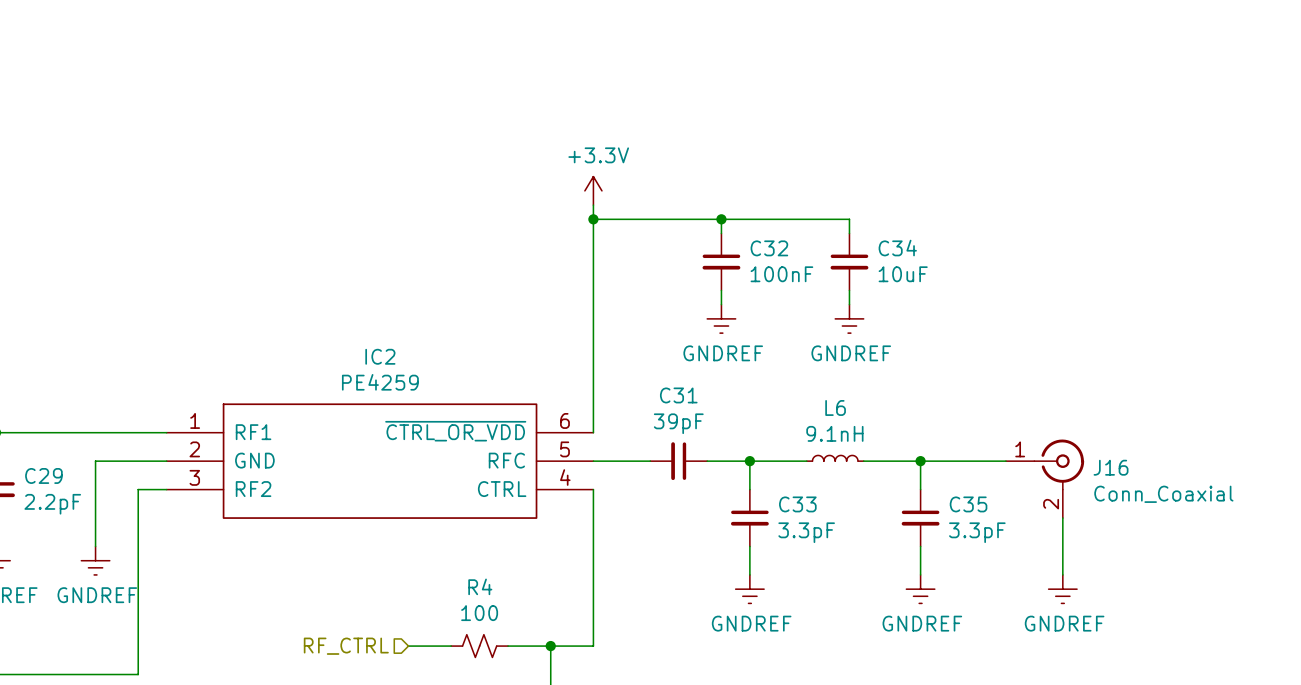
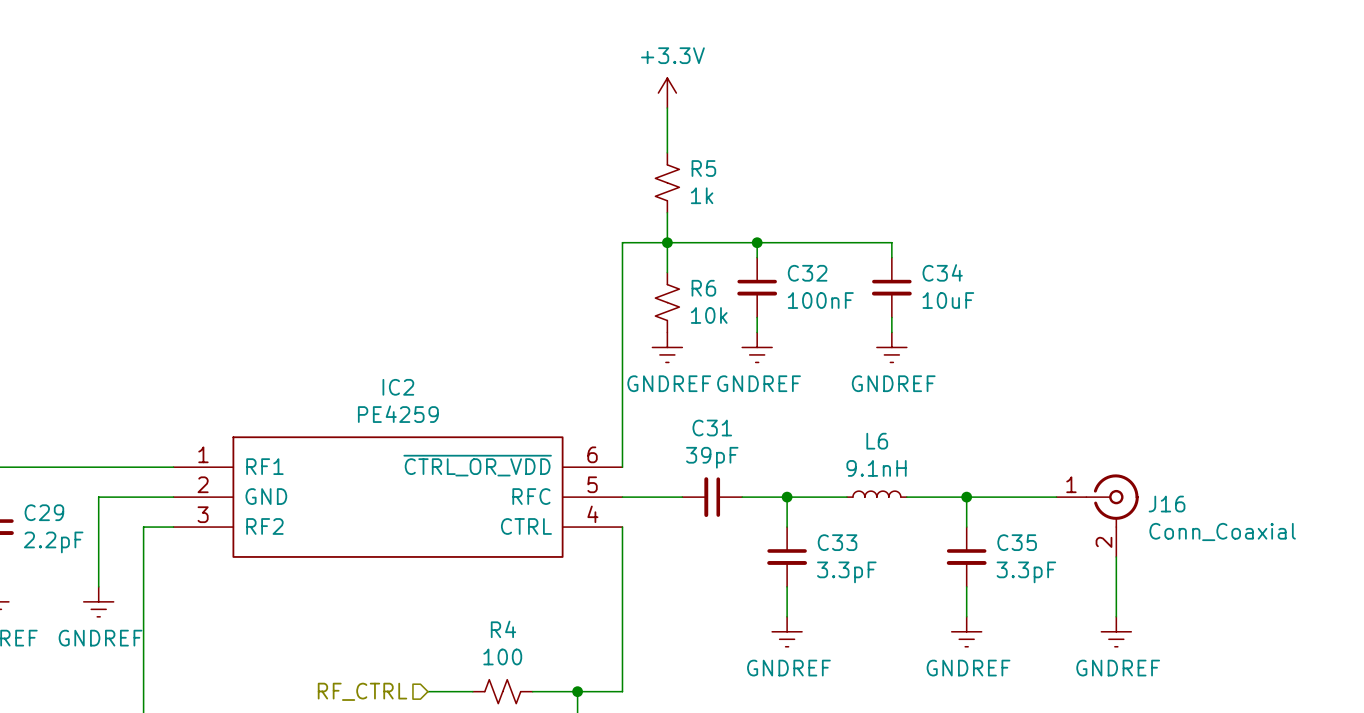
wire: none -> (667, 108) (667, 152)
R5: none -> 1k (667, 182)
power symbol position: +3.3V (593, 190) -> +3.3V (667, 93)
wire: none -> (667, 212) (667, 272)
wire: (593, 205) (593, 219) -> none
junction position: (593, 219) -> (667, 242)
R6: none -> 10k (667, 302)
power symbol: none -> GNDREF (667, 347)

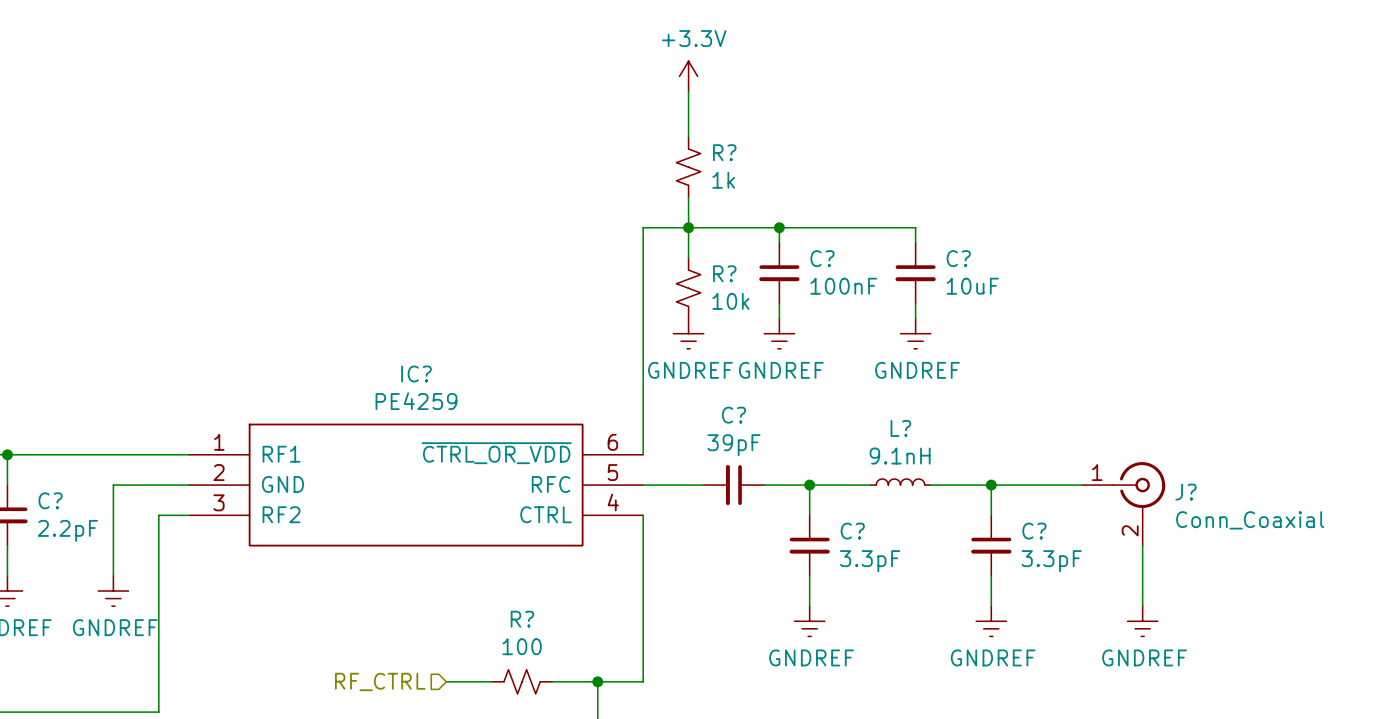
R5 name: R5 (703, 168) -> R? (724, 152)
C34 name: C34 (942, 272) -> C? (958, 258)
C32 name: C32 (807, 273) -> C? (822, 258)
R6 name: R6 (703, 288) -> R? (724, 273)
IC2 name: IC2 (398, 387) -> IC? (416, 373)
C31 name: C31 (712, 428) -> C? (733, 415)
L6 name: L6 (877, 441) -> L? (900, 428)
J16 name: J16 (1167, 504) -> J? (1186, 492)
C29 name: C29 (44, 512) -> C? (50, 500)
C33 name: C33 (837, 542) -> C? (852, 531)
C35 name: C35 (1017, 542) -> C? (1034, 531)
R4 name: R4 (503, 629) -> R? (522, 619)

